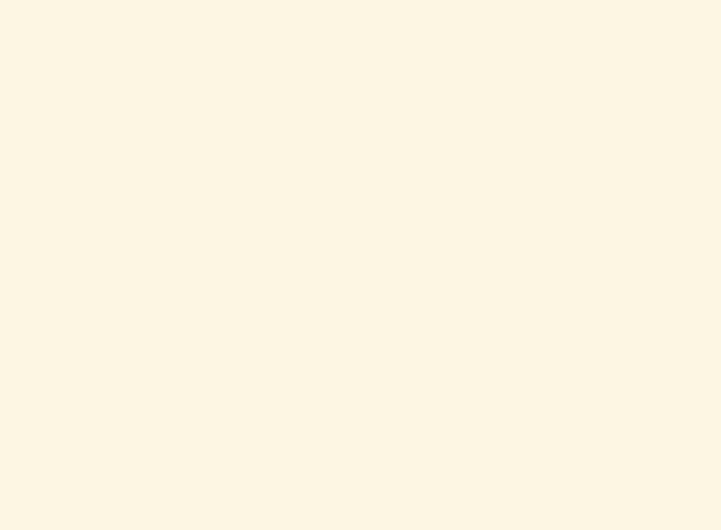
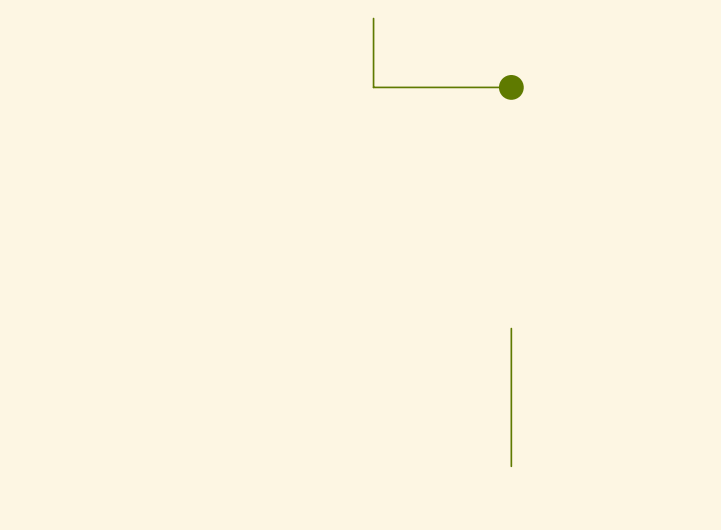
wire: none -> (373, 18) (373, 87) (511, 87)
junction: none -> (511, 87)
wire: none -> (511, 328) (511, 466)

